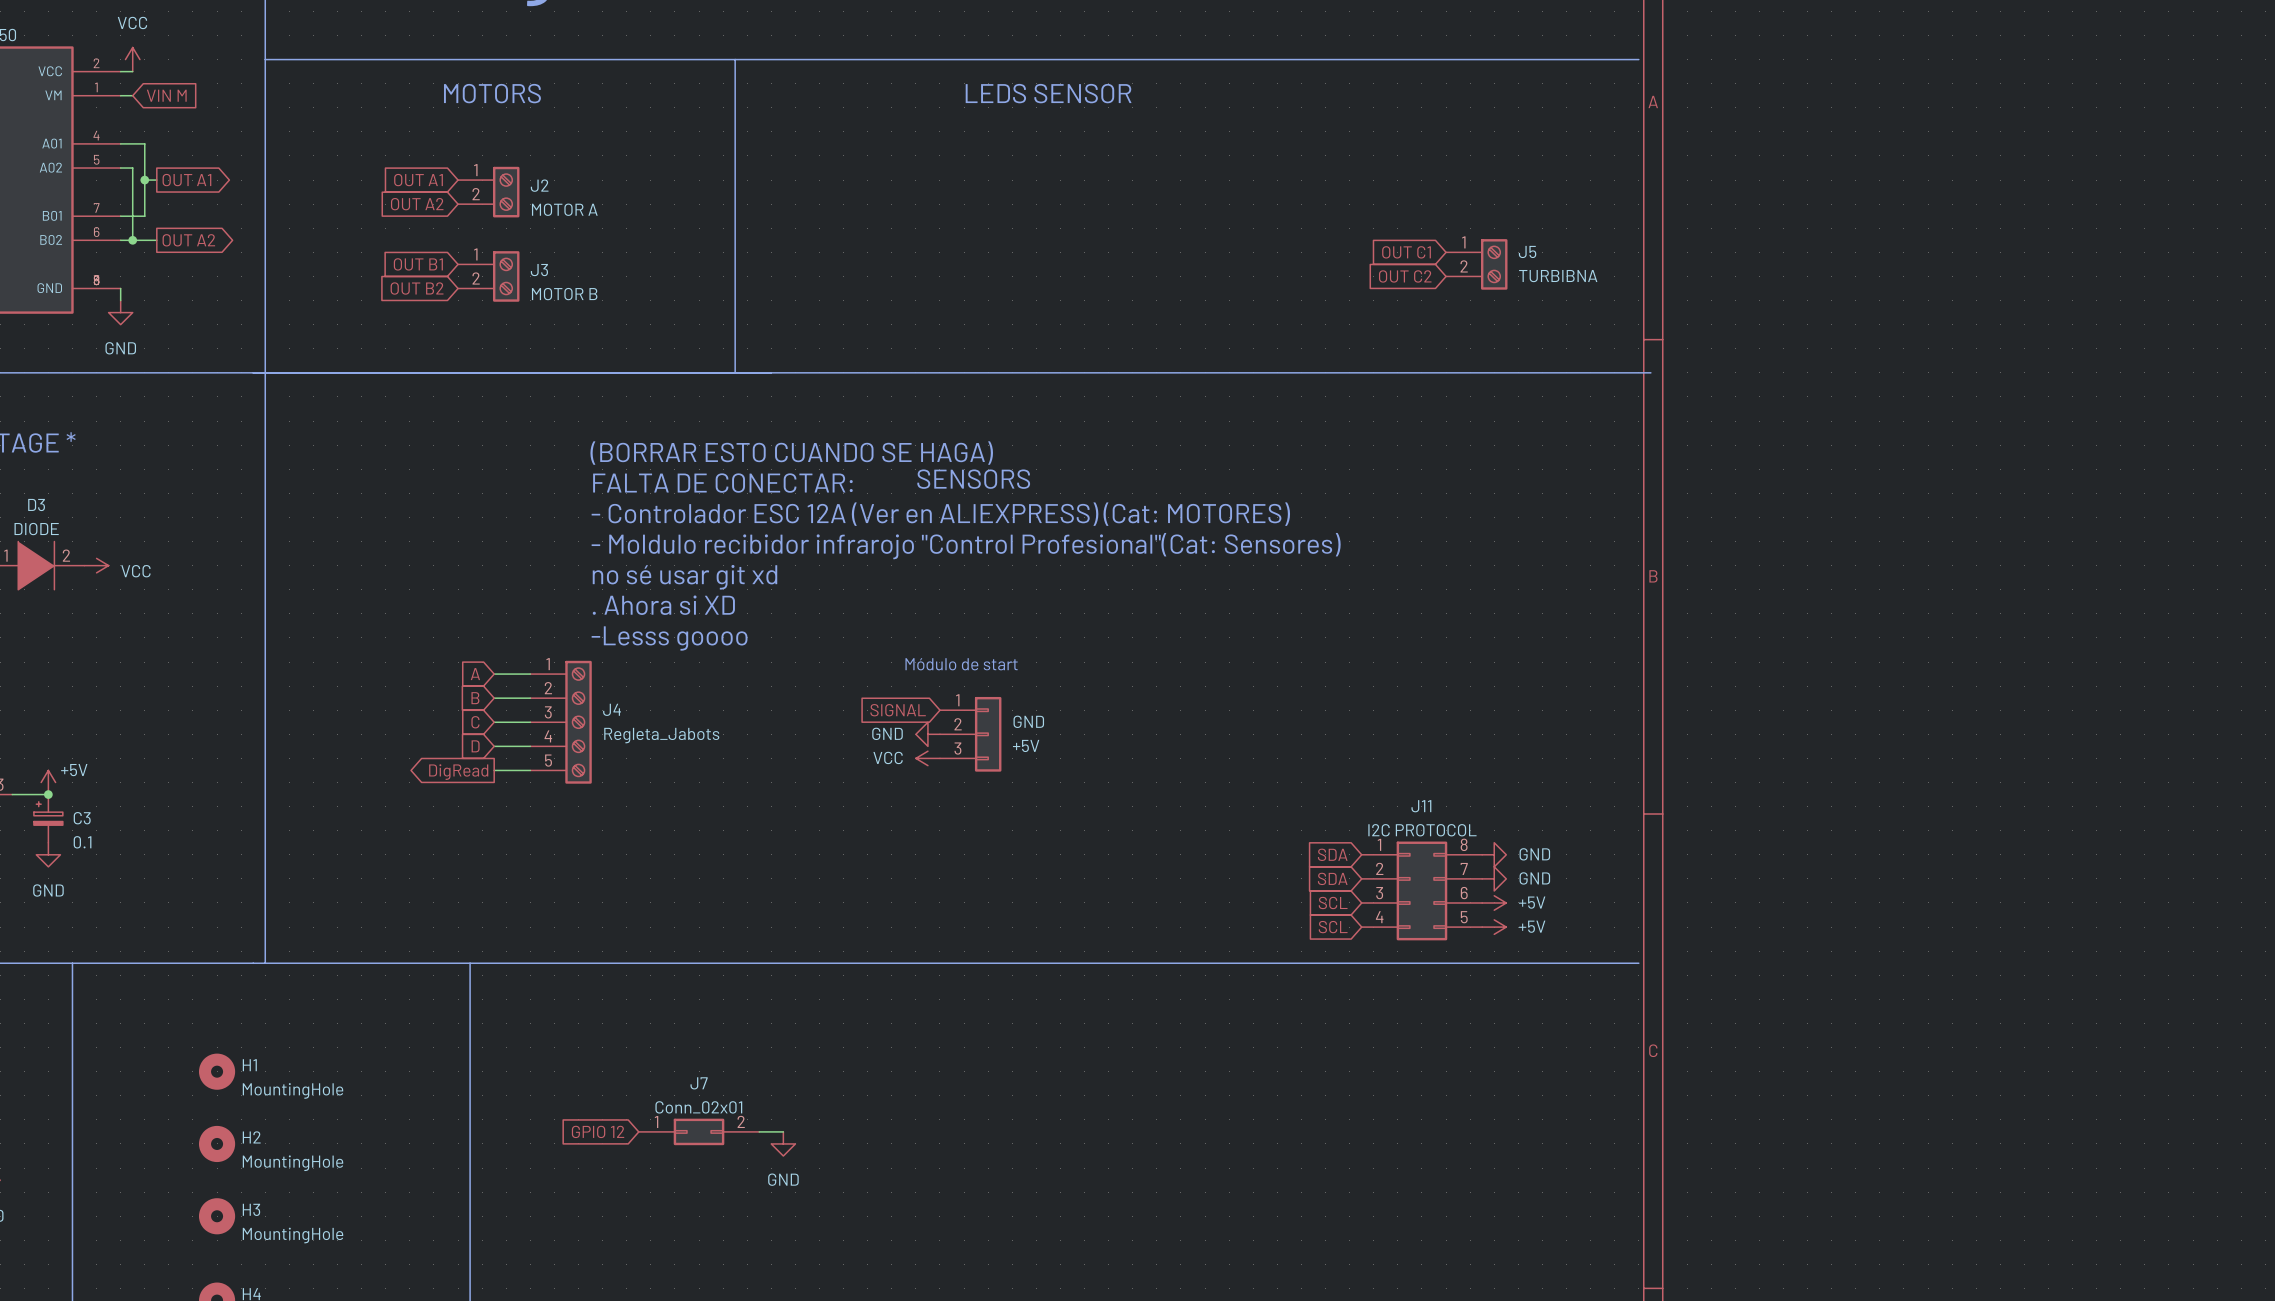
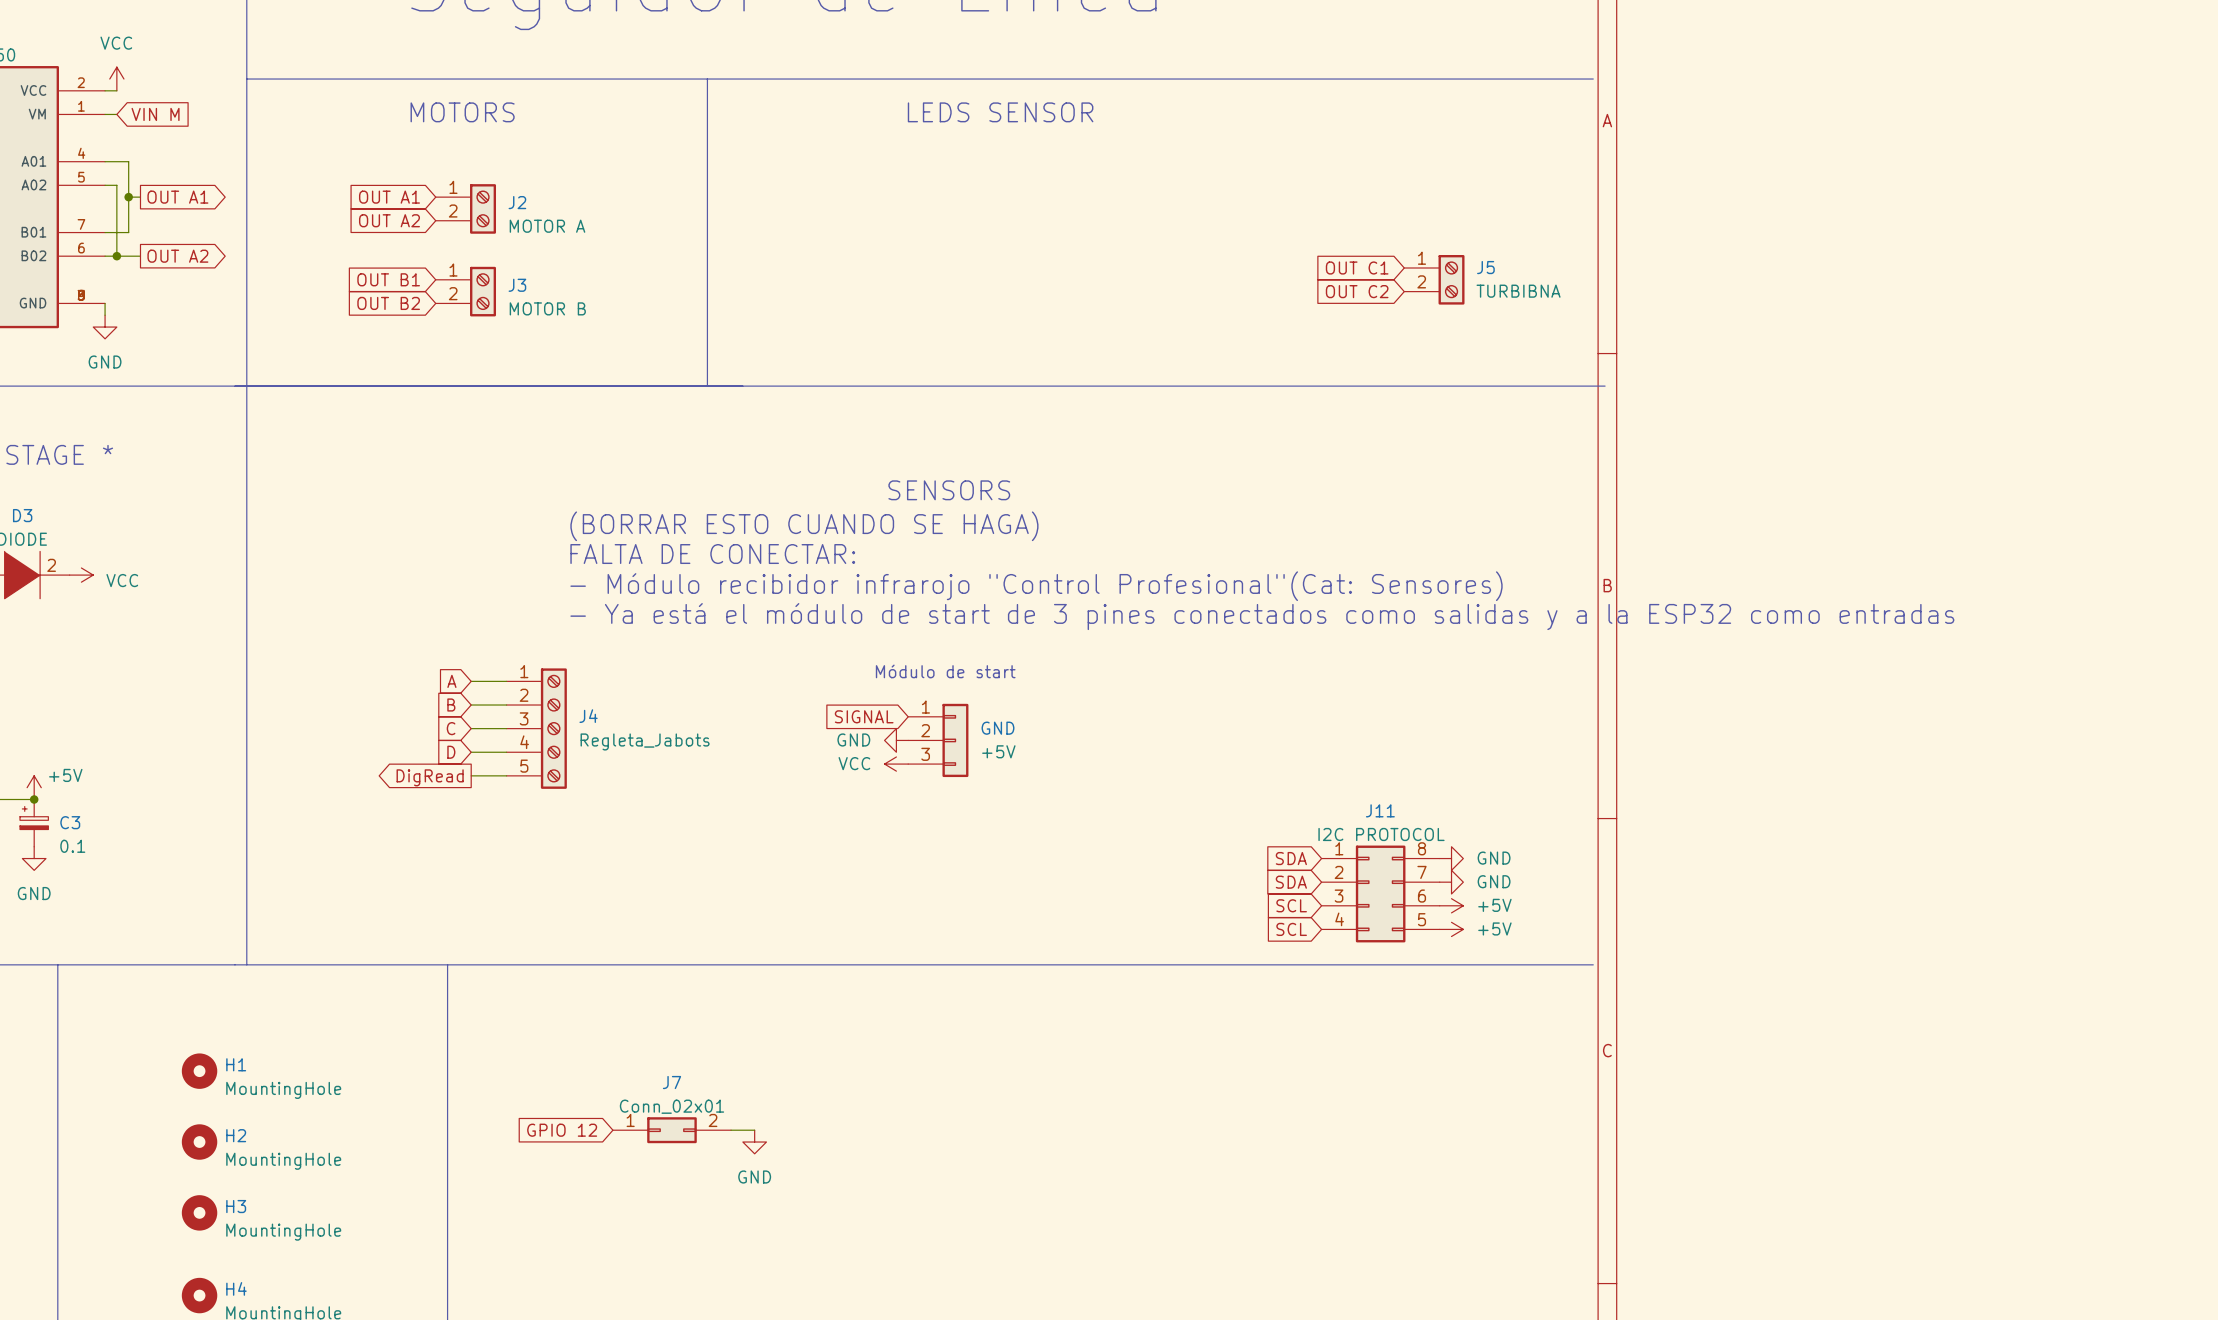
text: (BORRAR ESTO CUANDO SE HAGA) (791, 453) -> none
text: FALTA DE CONECTAR: (722, 483) -> none
text: - Controlador ESC 12A (Ver en ALIEXPRESS) (Cat: MOTORES) (940, 514) -> (BORRAR ESTO CUANDO SE HAGA) (804, 526)
text: - Moldulo recibidor infrarojo "Control Profesional"(Cat: Sensores) (966, 546) -> FALTA DE CONECTAR: (712, 554)
text: no sé usar git xd (684, 577) -> - Módulo recibidor infrarojo "Control Profesional"(Cat: Sensores) (1036, 586)
text: . Ahora si XD (663, 605) -> - Ya está el módulo de start de 3 pines conectados como salidas y a la ESP32 como entradas (1262, 616)
text: -Lesss goooo (669, 638) -> none

